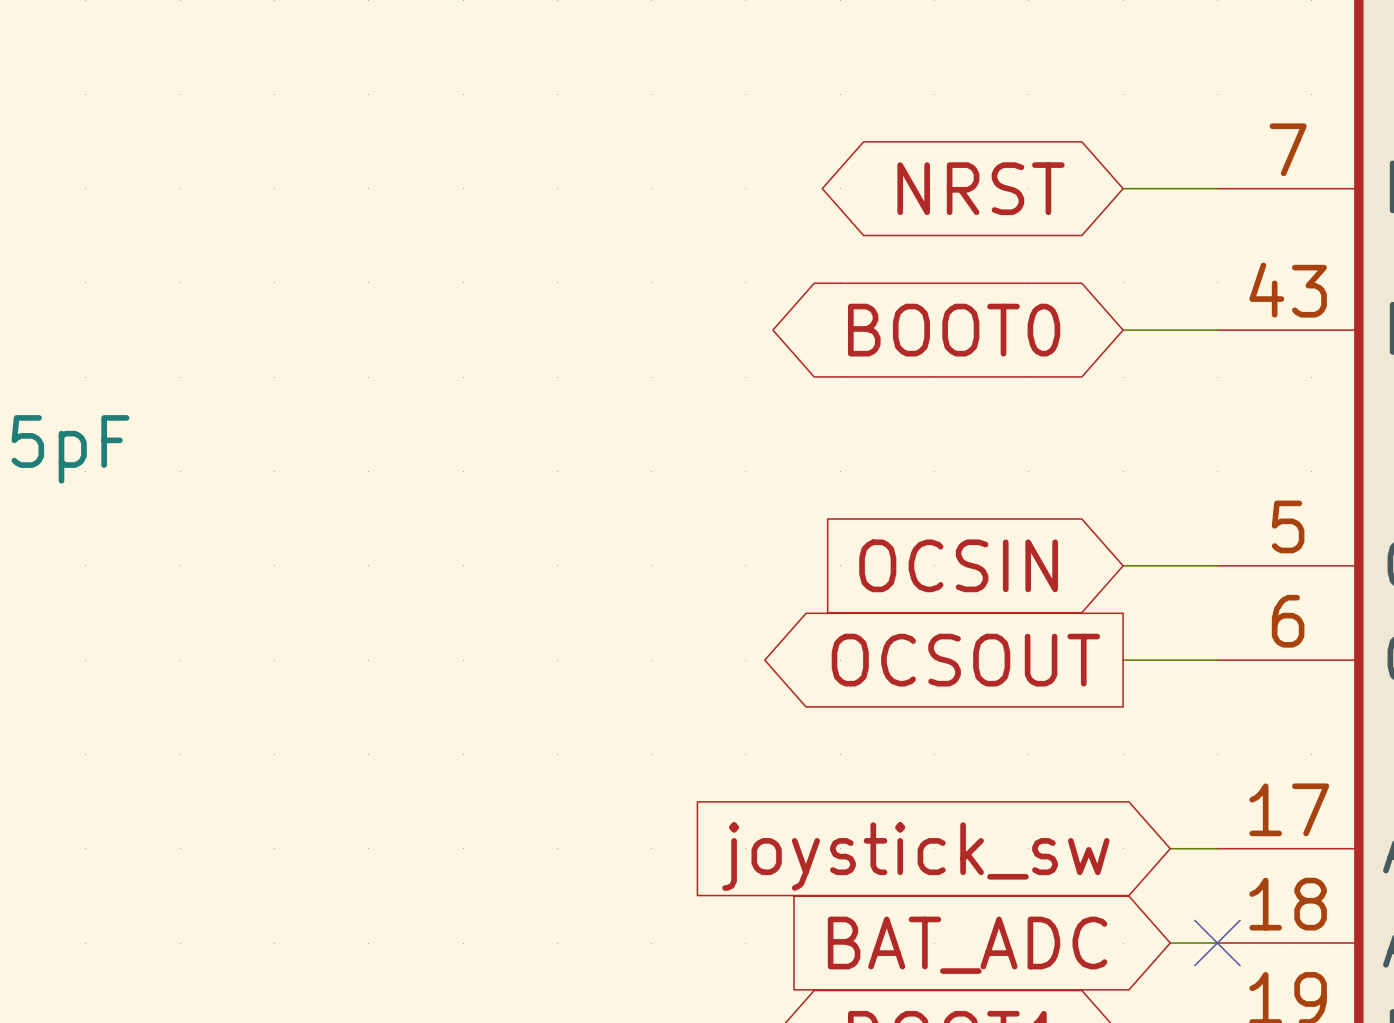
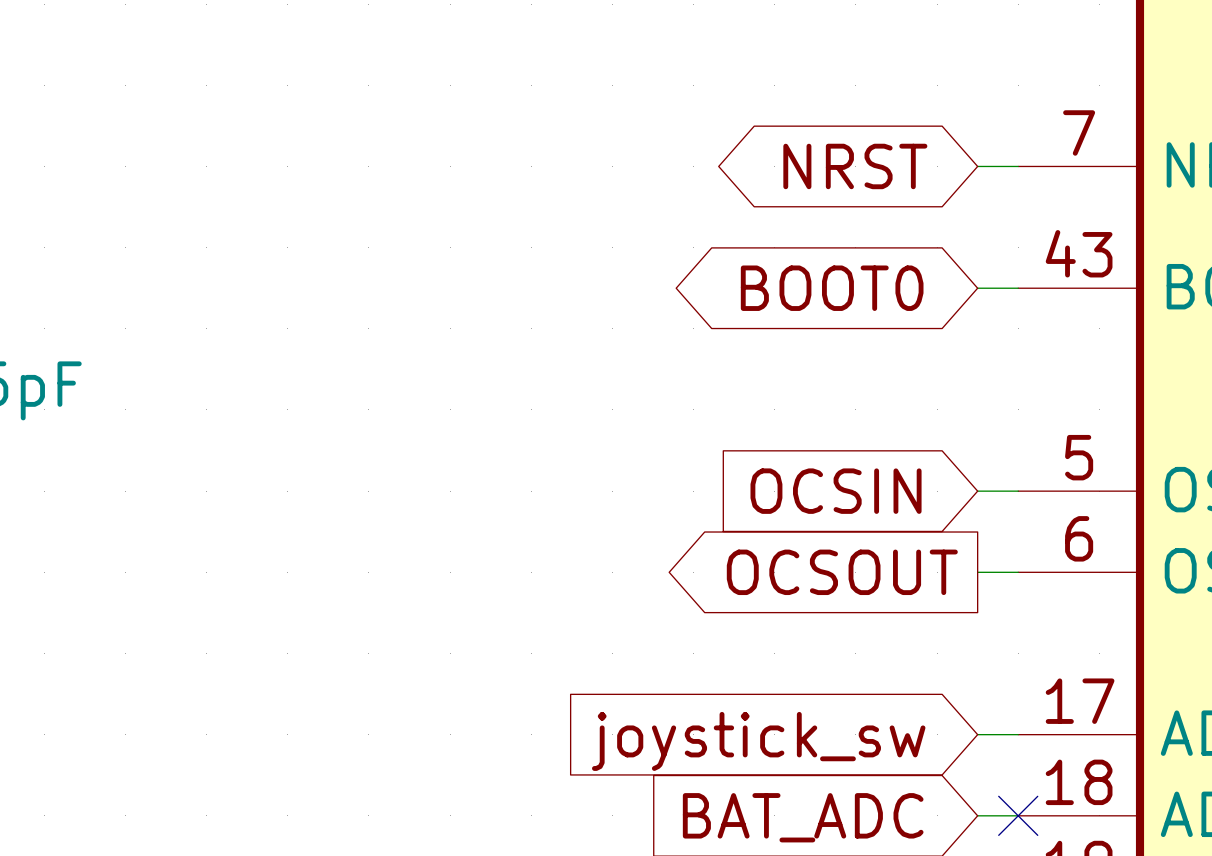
global label position: NRST (981, 188) -> NRST (855, 166)
wire: (1123, 188) (1170, 188) -> none
global label position: BOOT0 (954, 330) -> BOOT0 (832, 288)
wire: (1123, 330) (1170, 330) -> none
global label position: OCSIN (958, 565) -> OCSIN (836, 491)
wire: (1123, 565) (1170, 565) -> none
global label position: OCSOUT (965, 660) -> OCSOUT (842, 572)
wire: (1123, 660) (1170, 660) -> none

